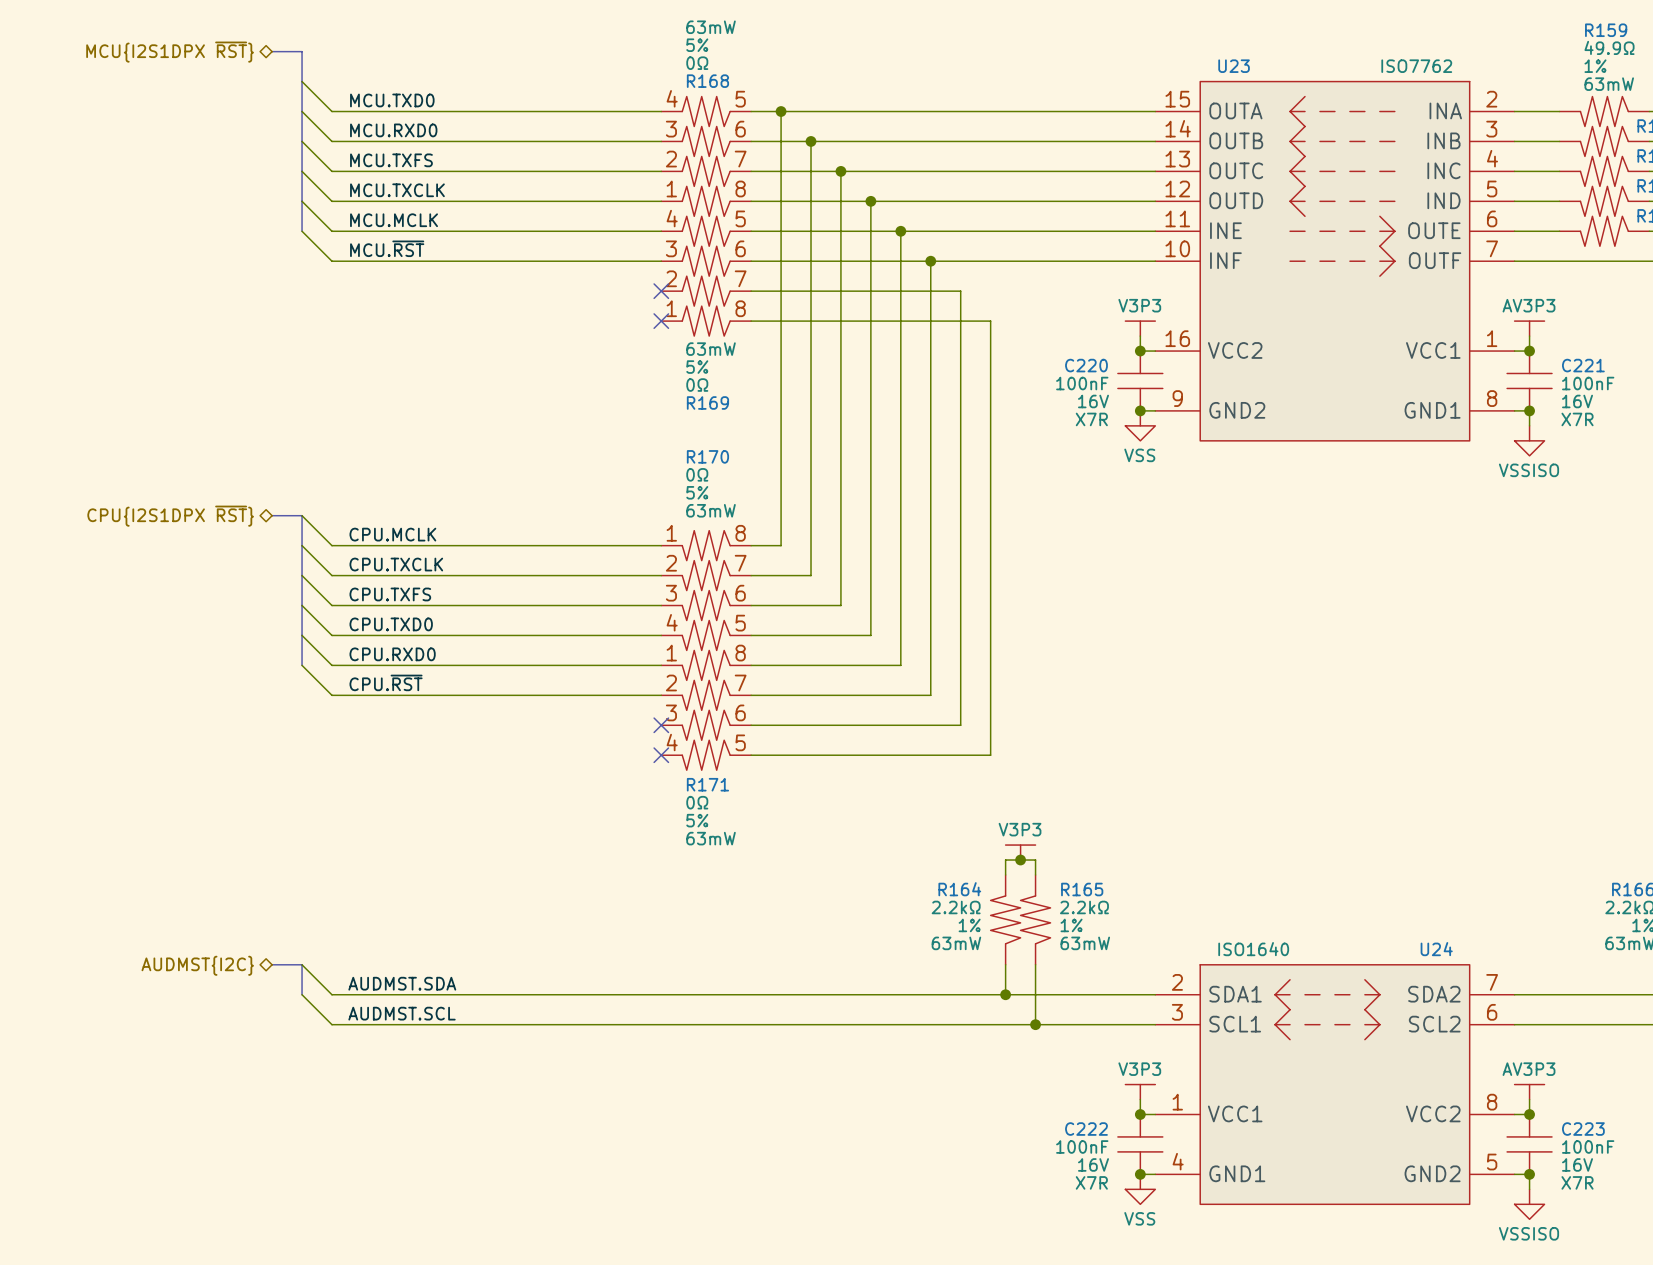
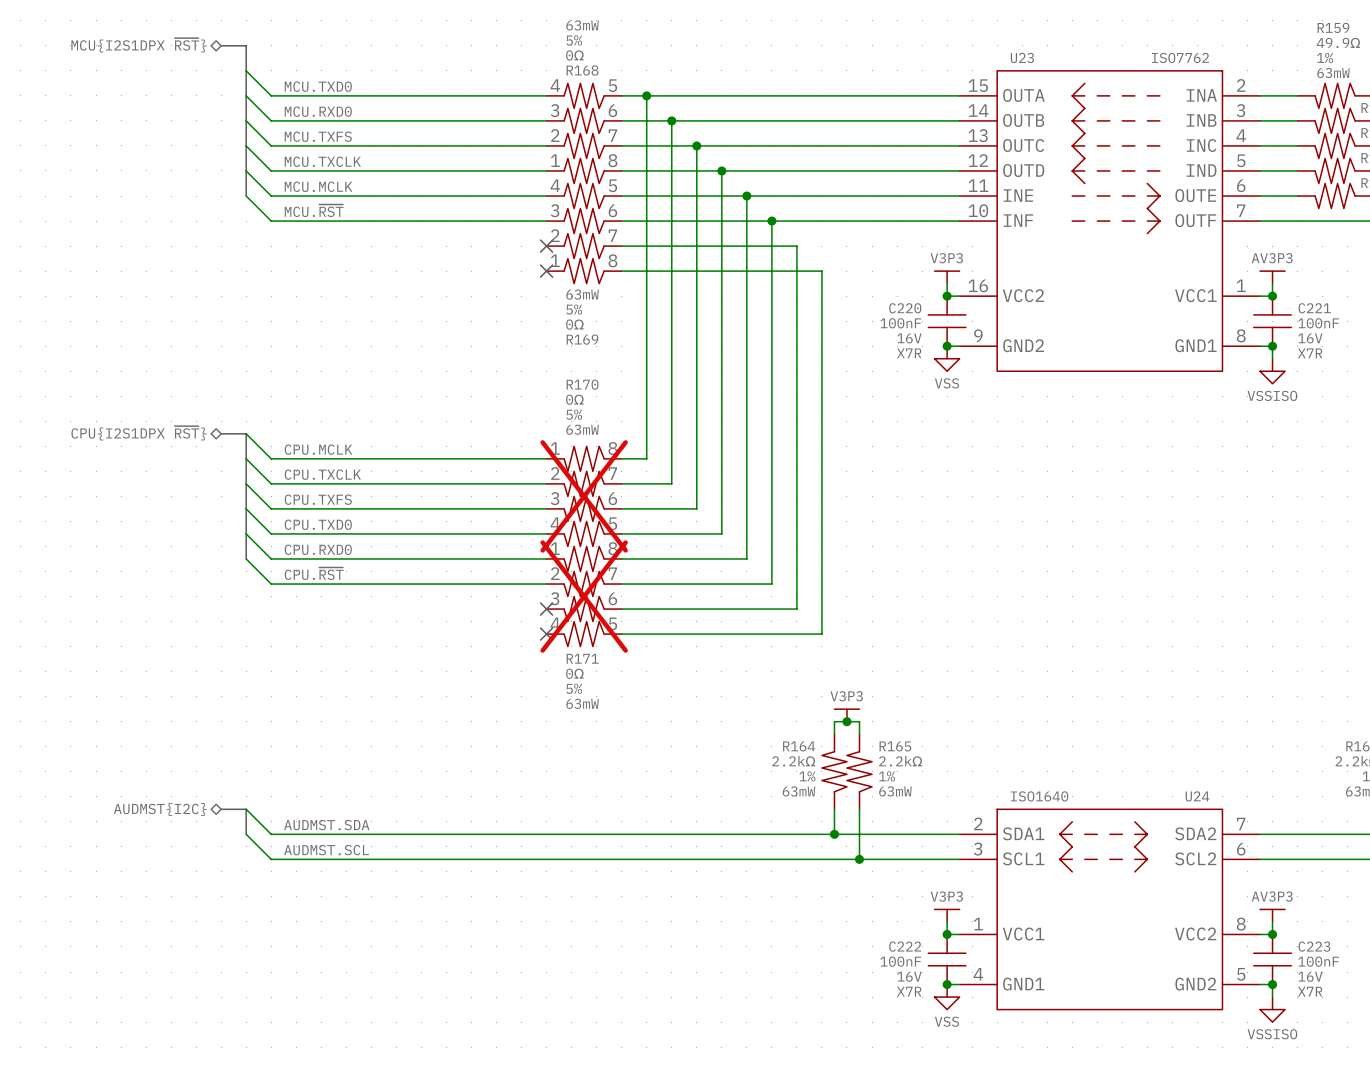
R170 do-not-place cross: none -> (584, 496)
R171 do-not-place cross: none -> (584, 596)

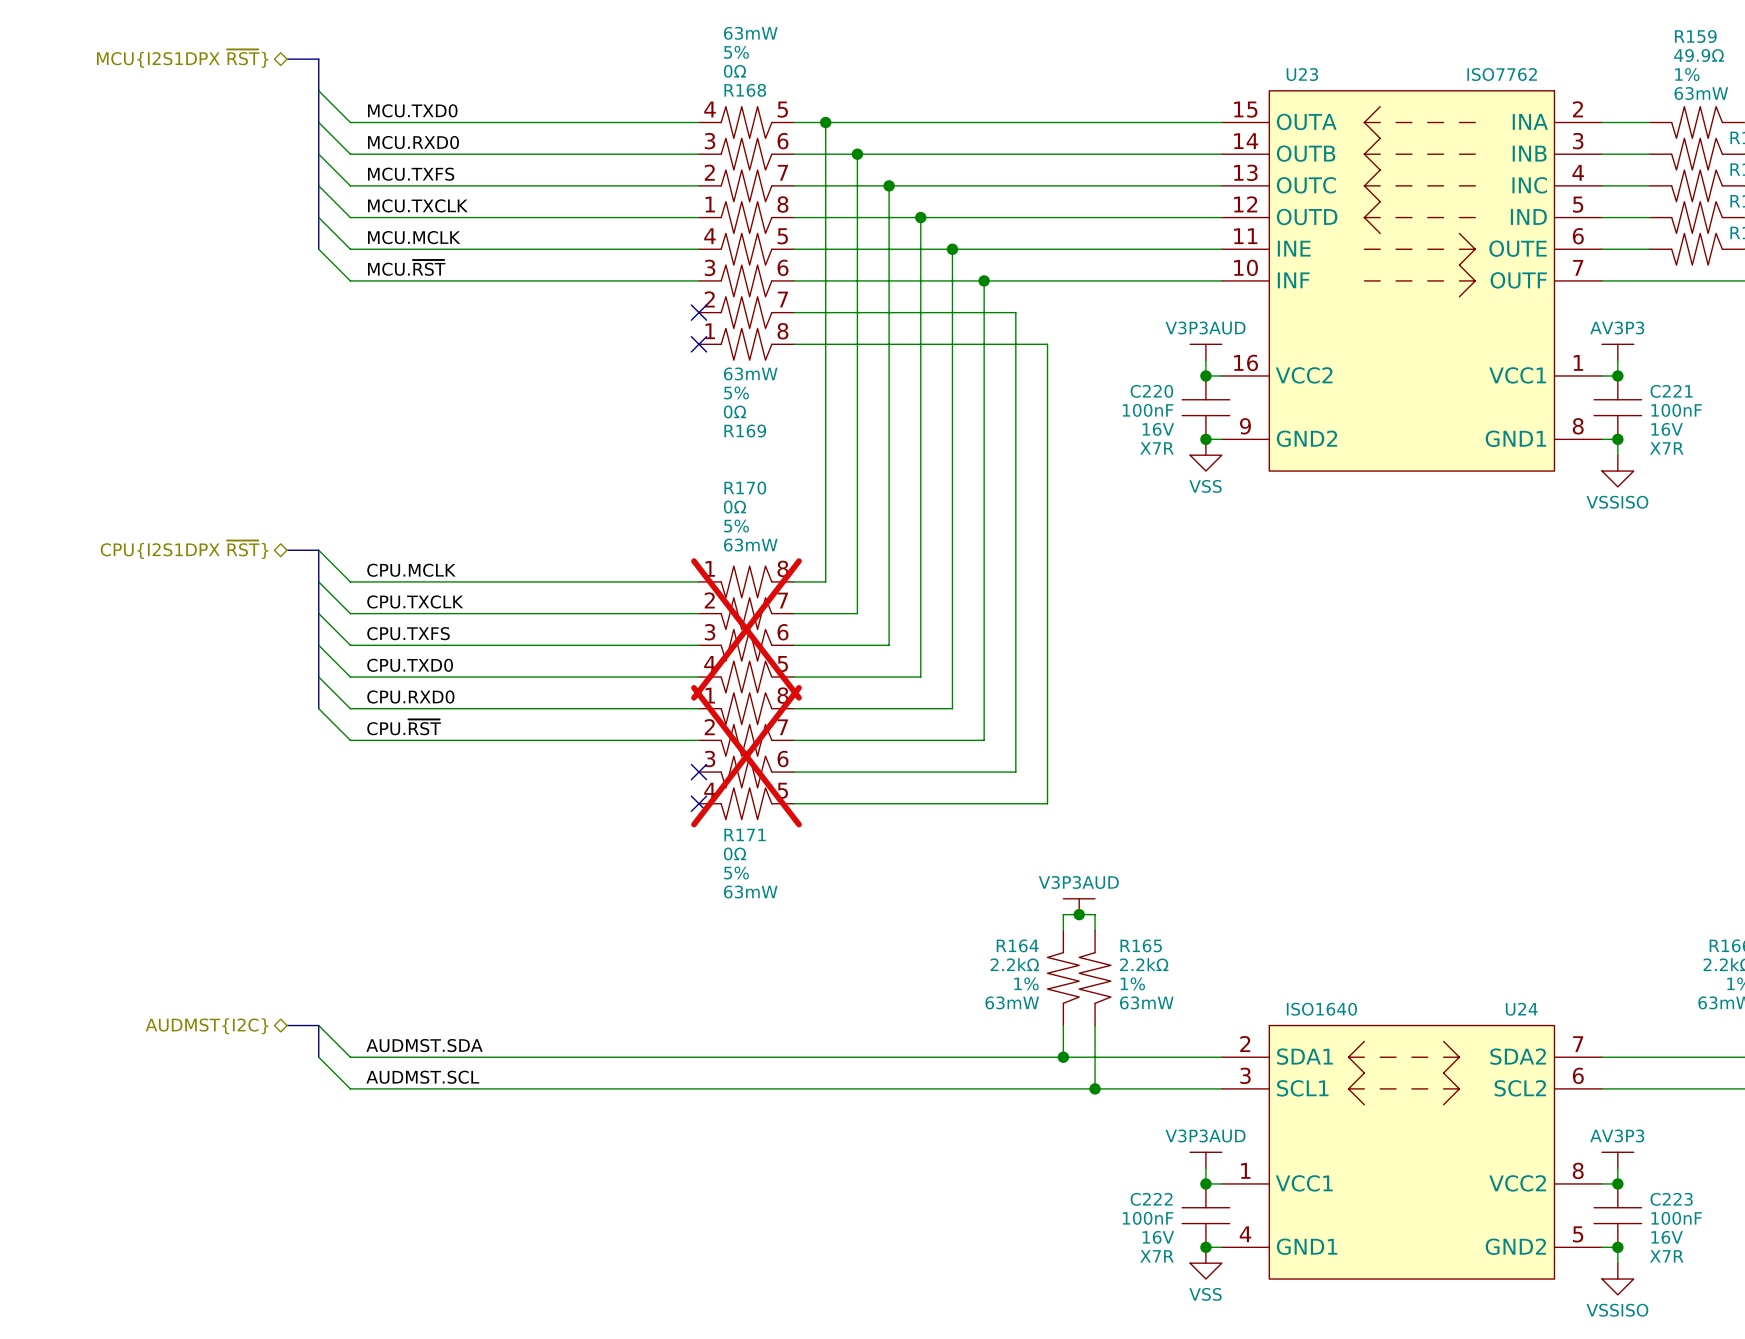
power symbol: V3P3 (947, 277) -> V3P3AUD (1205, 352)
power symbol: V3P3 (846, 715) -> V3P3AUD (1079, 906)
power symbol: V3P3 (947, 915) -> V3P3AUD (1205, 1160)

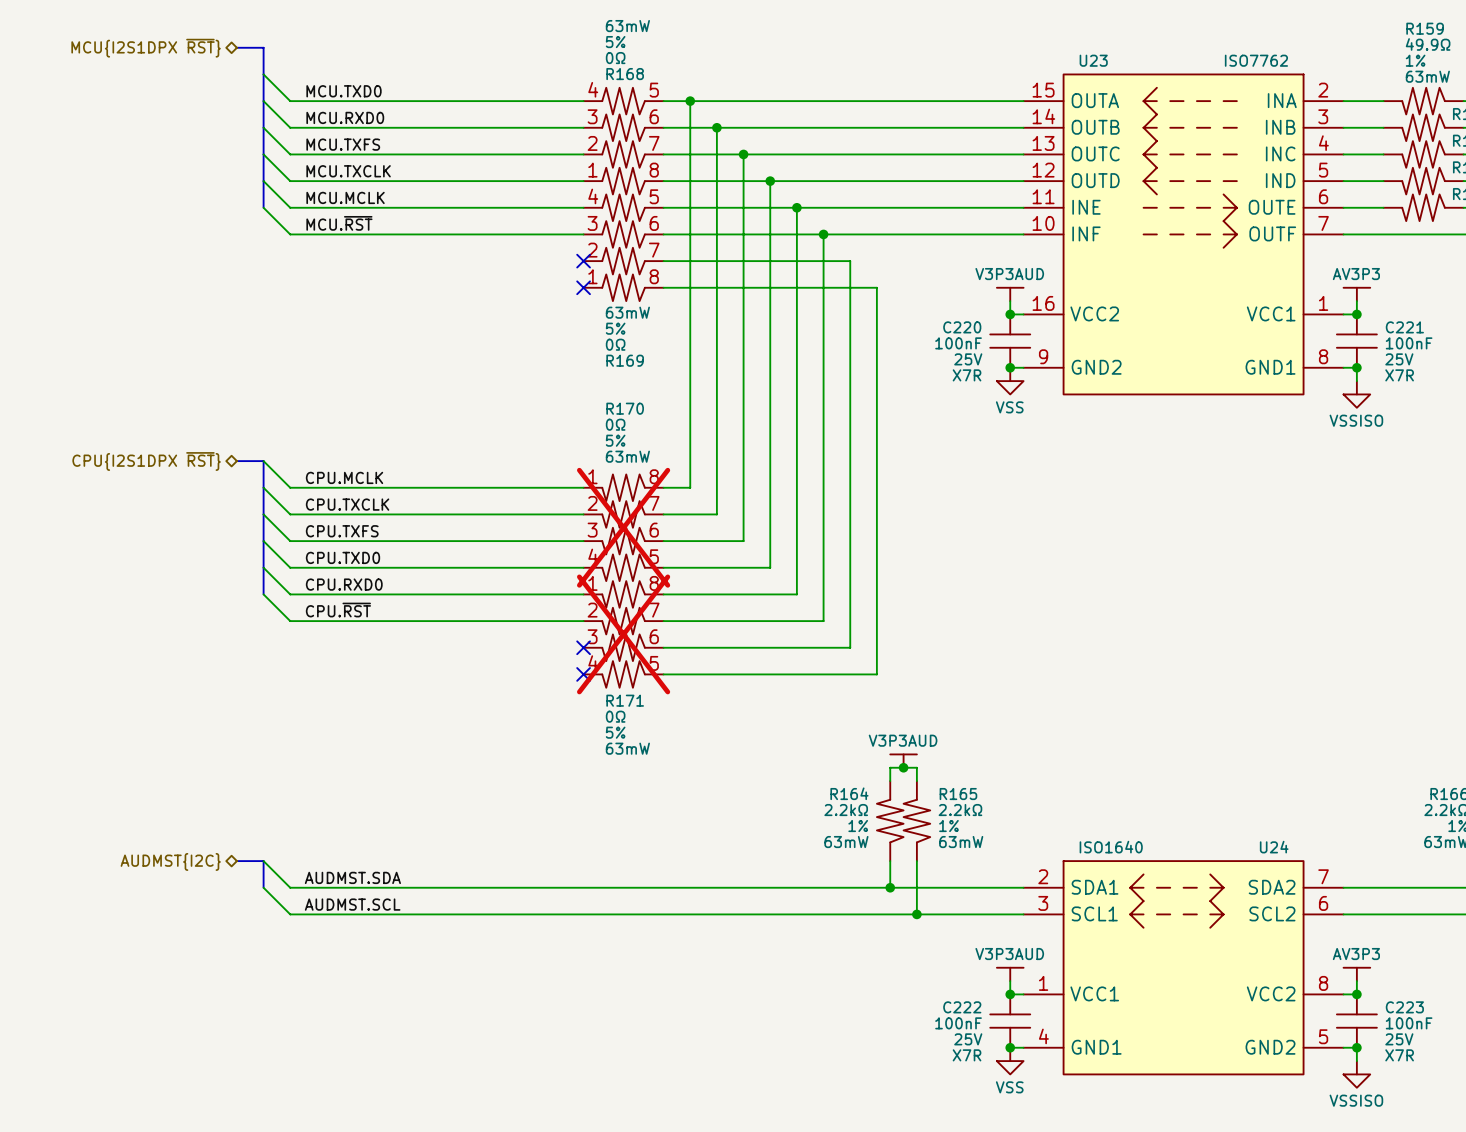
C220 text: 16V (1158, 429) -> 25V (968, 359)
C221 text: 16V (1667, 429) -> 25V (1399, 359)
C222 text: 16V (1158, 1237) -> 25V (968, 1039)
C223 text: 16V (1667, 1237) -> 25V (1399, 1039)

